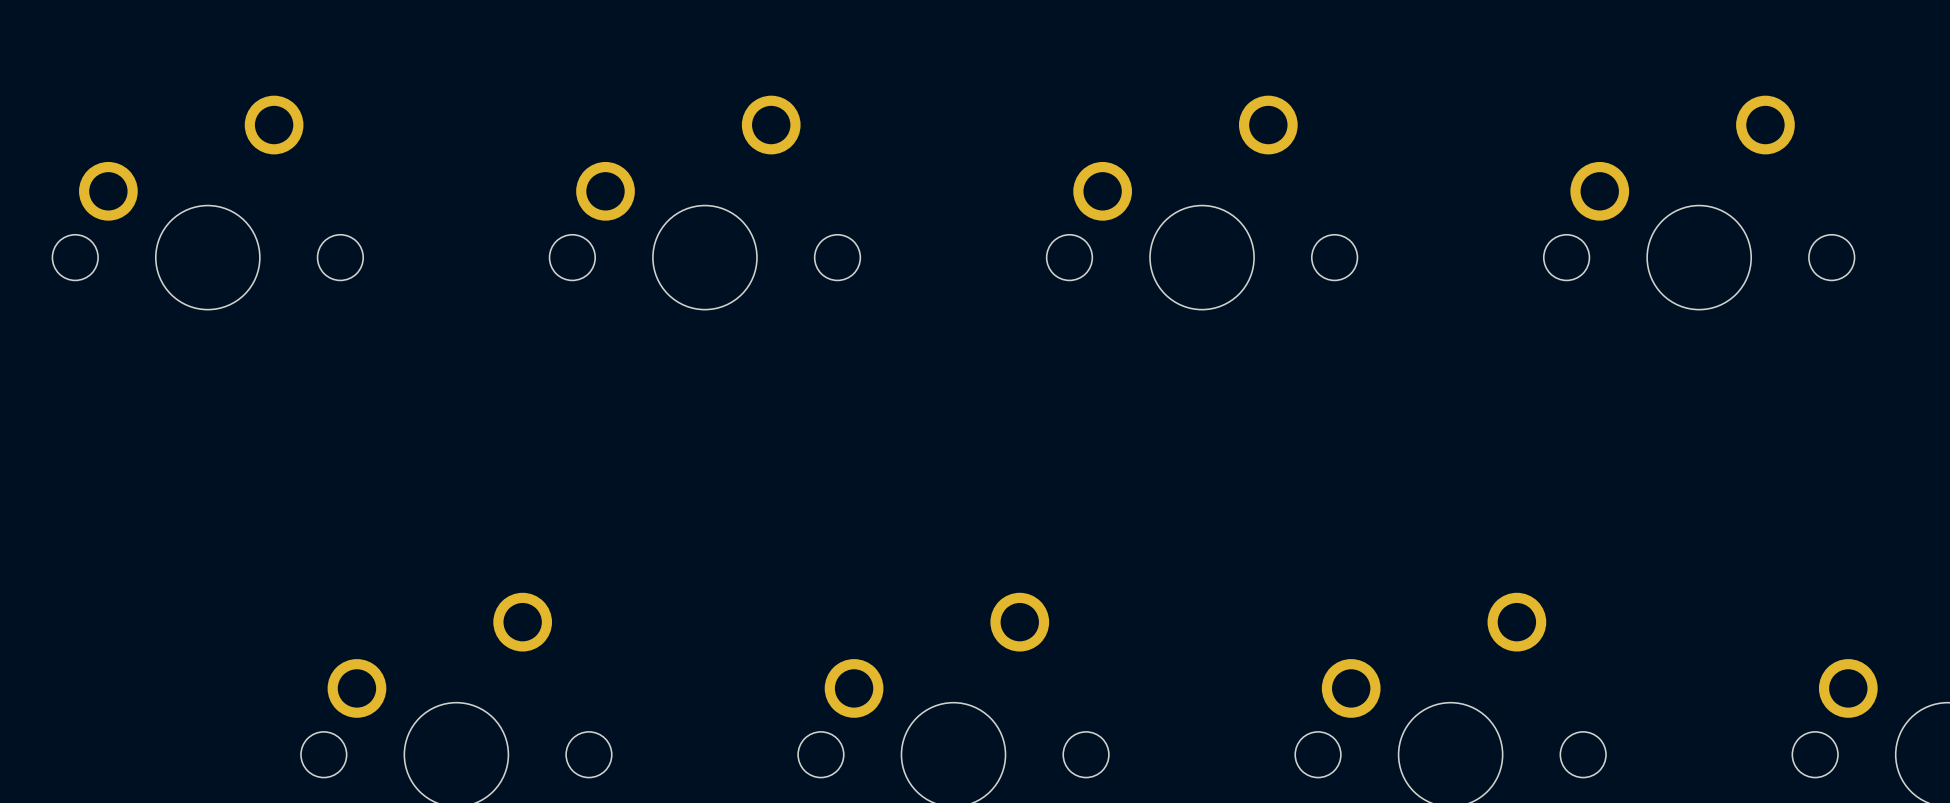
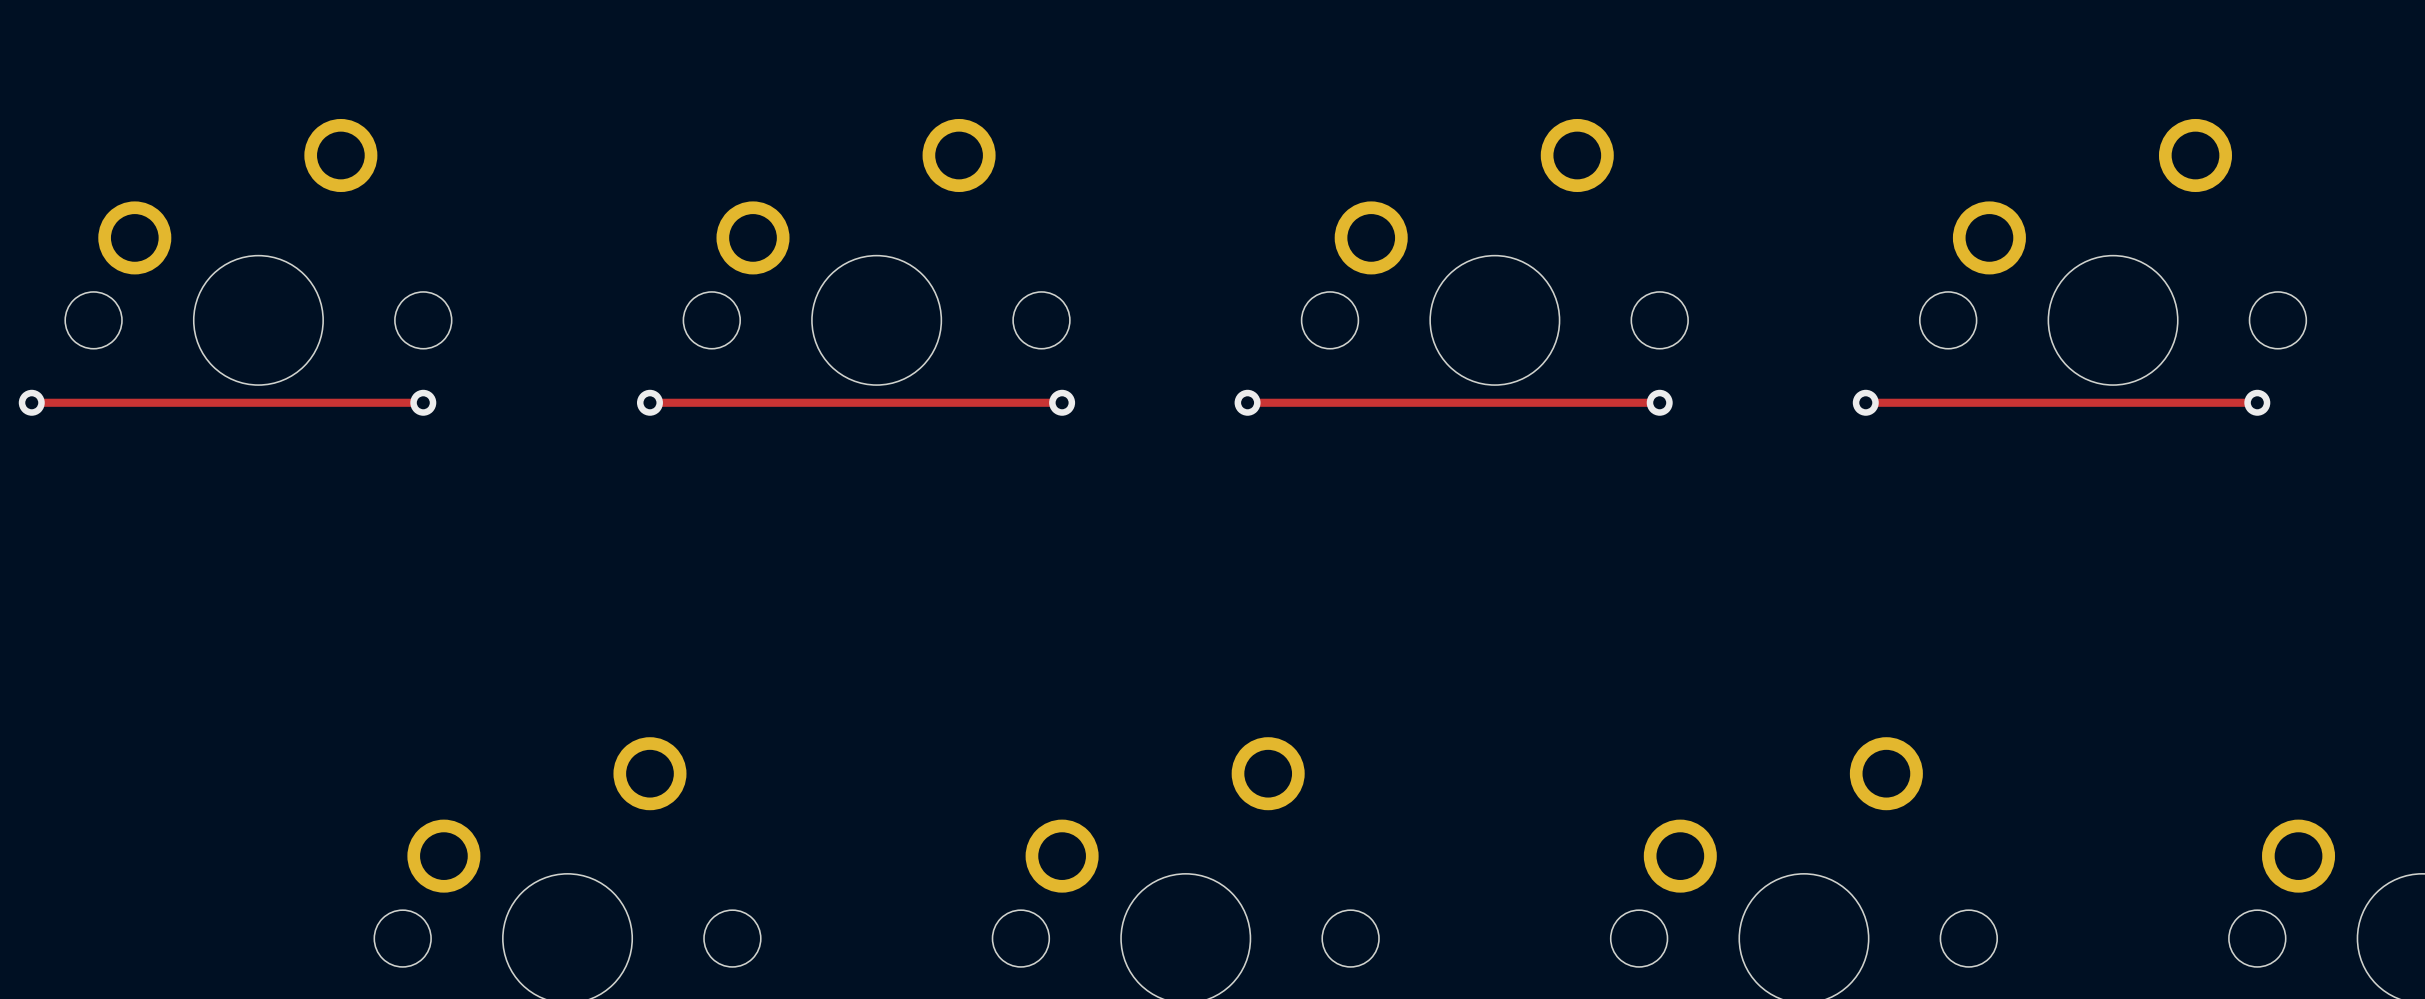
track: none -> (31, 402) (423, 402)
via: none -> (31, 402)
via: none -> (423, 402)
track: none -> (649, 402) (1062, 402)
via: none -> (649, 402)
via: none -> (1062, 402)
track: none -> (1247, 402) (1659, 402)
via: none -> (1247, 402)
via: none -> (1659, 402)
track: none -> (1865, 402) (2257, 402)
via: none -> (1865, 402)
via: none -> (2257, 402)

